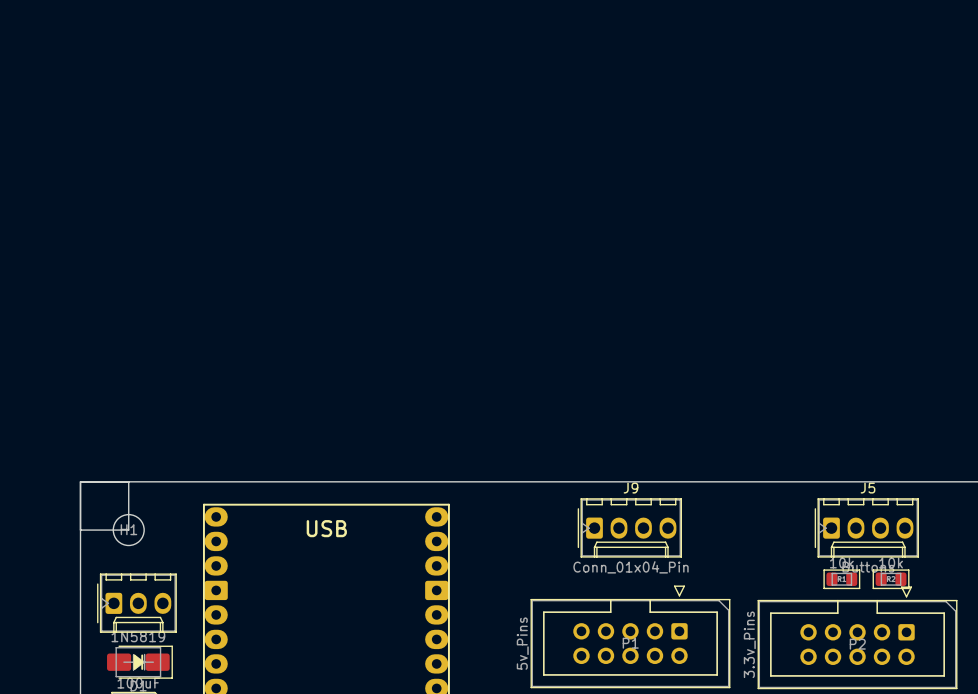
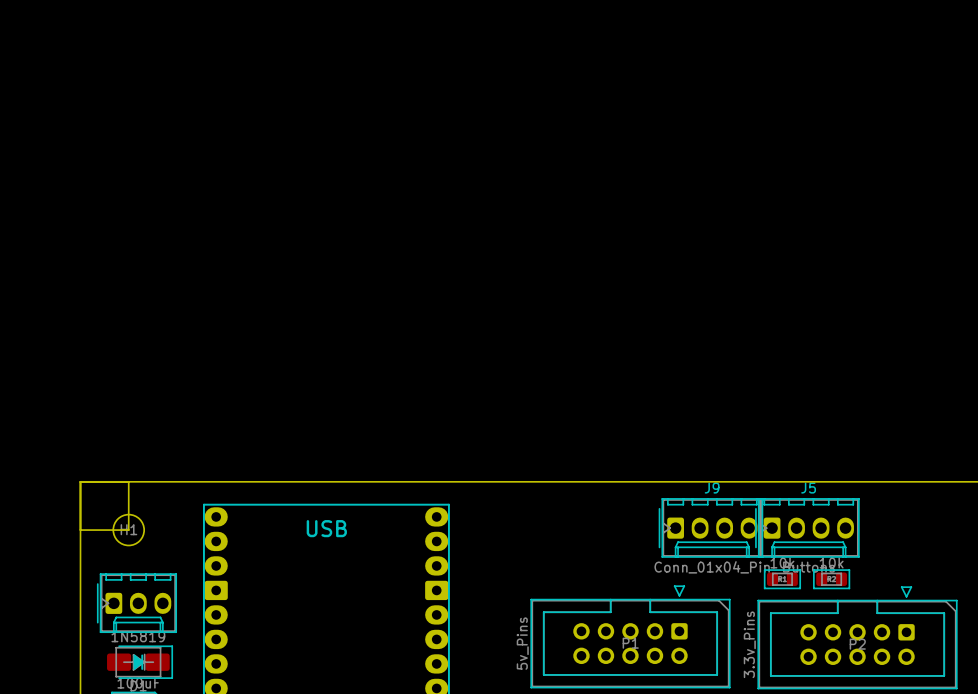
J9 position: (629, 527) -> (710, 527)
J5 position: (866, 527) -> (807, 527)
part position: (841, 579) -> (782, 579)
part position: (891, 579) -> (831, 579)

